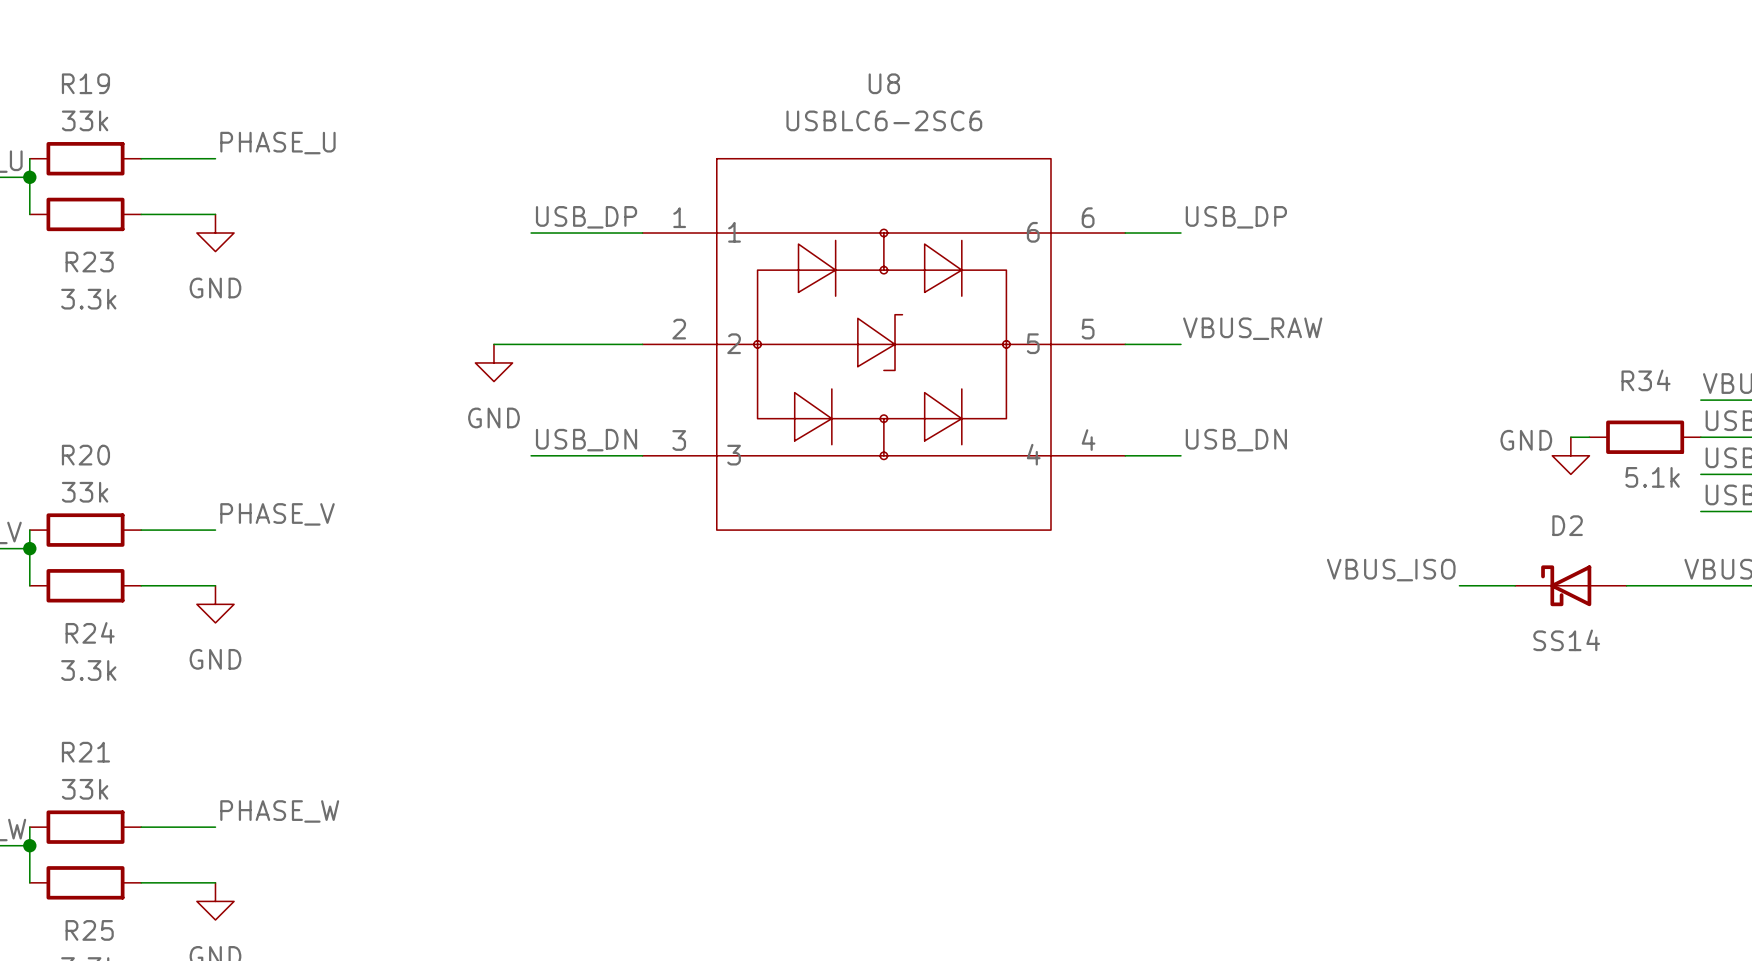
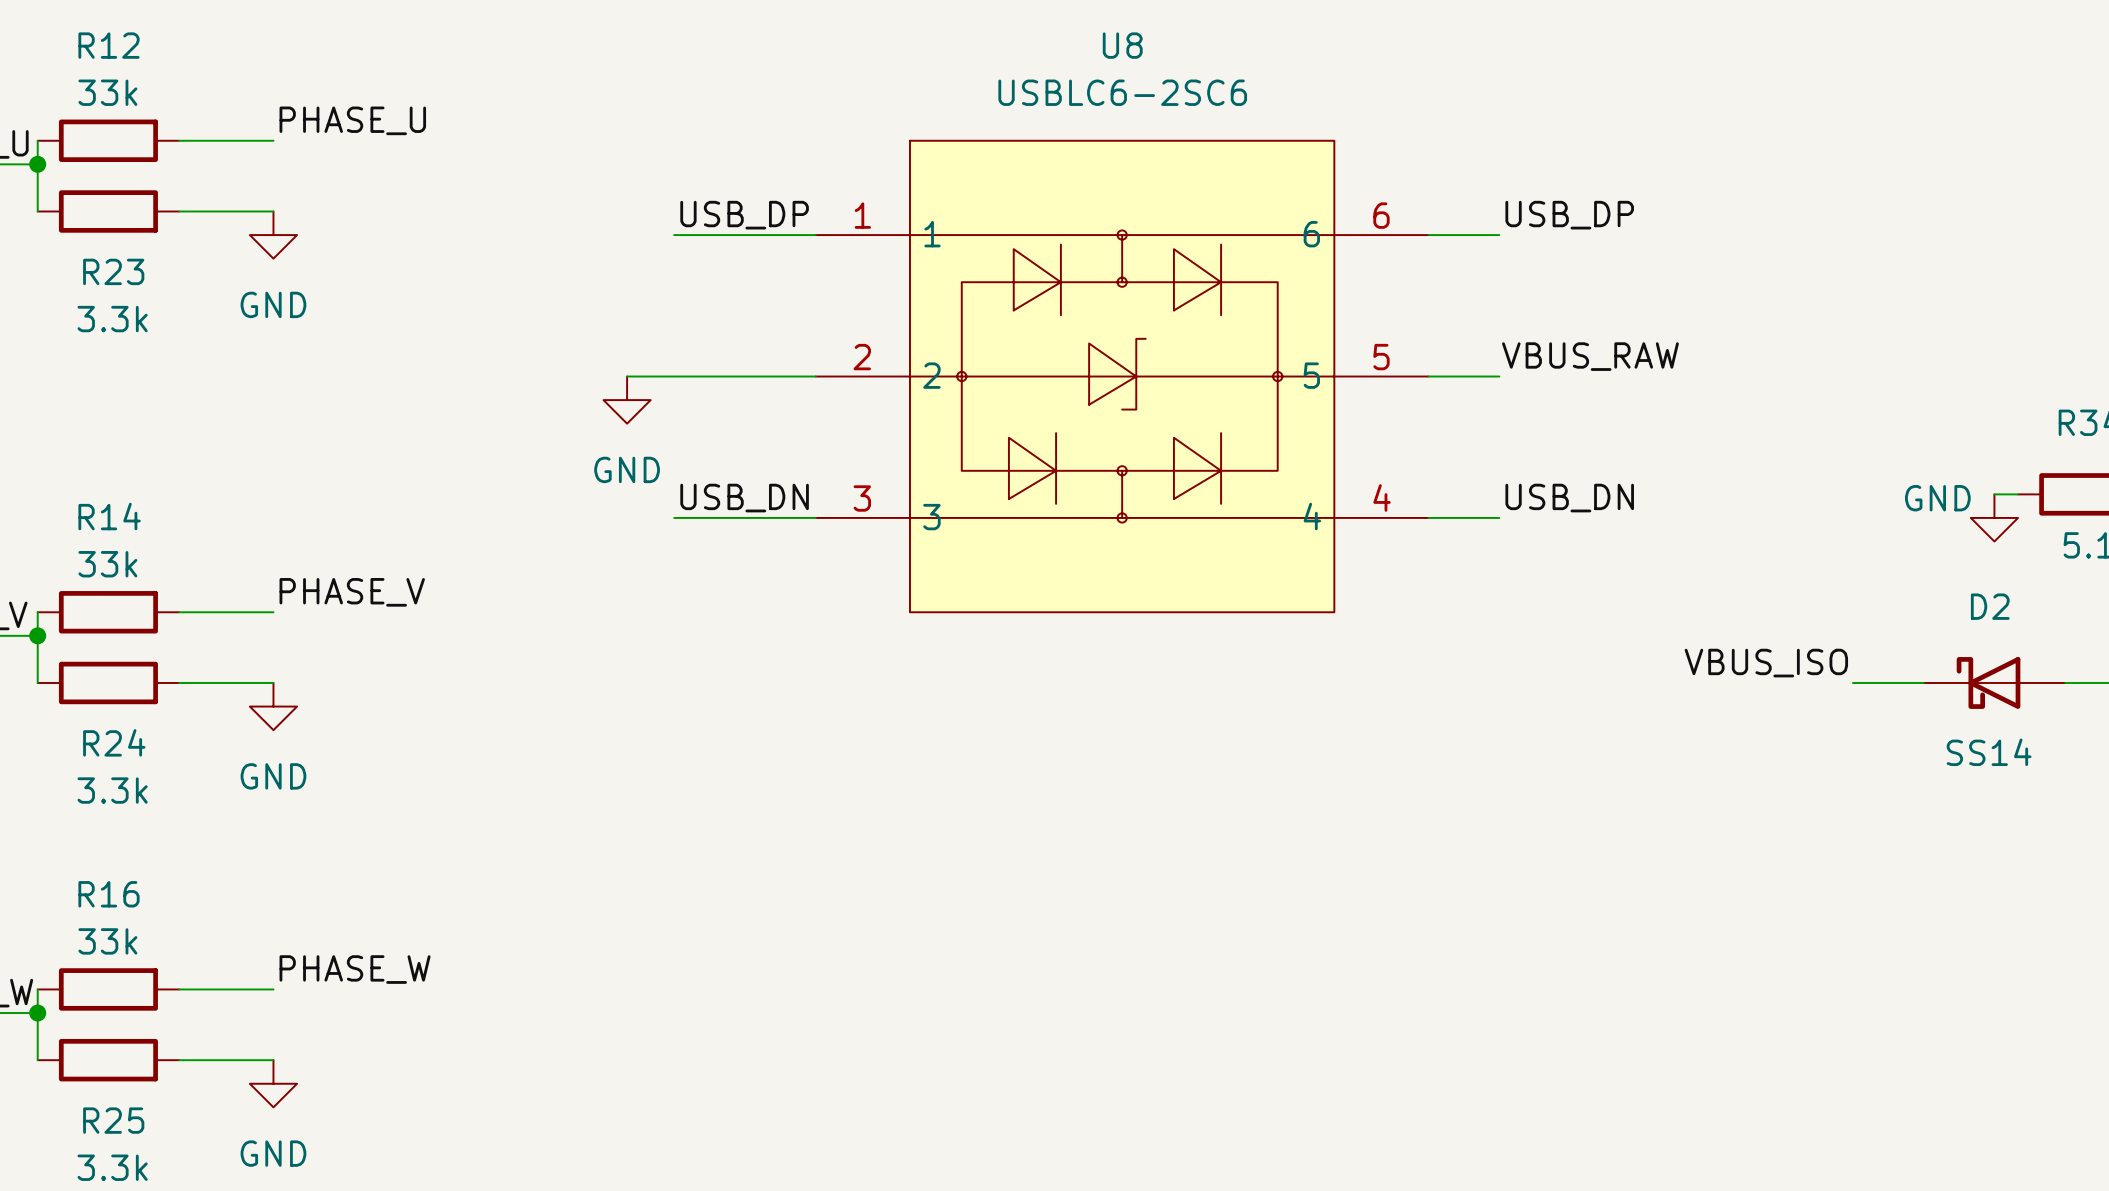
R19 name: R19 (85, 83) -> R12 (109, 45)
R20 name: R20 (85, 455) -> R14 (109, 516)
R21 name: R21 (85, 752) -> R16 (109, 894)

